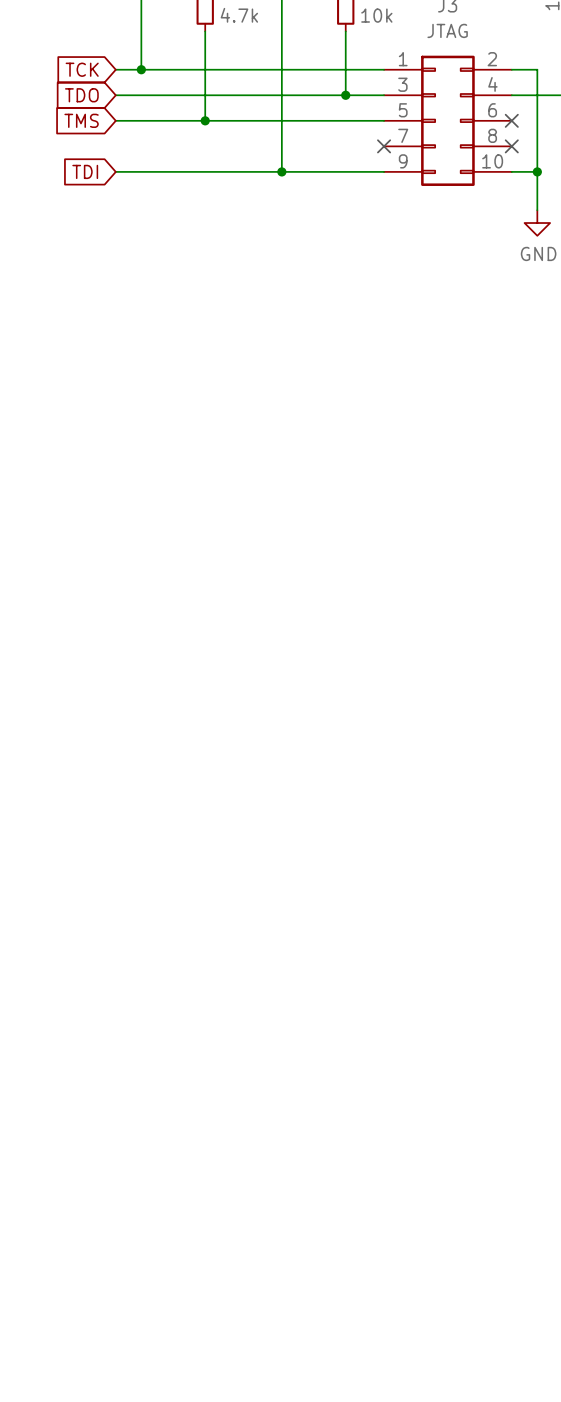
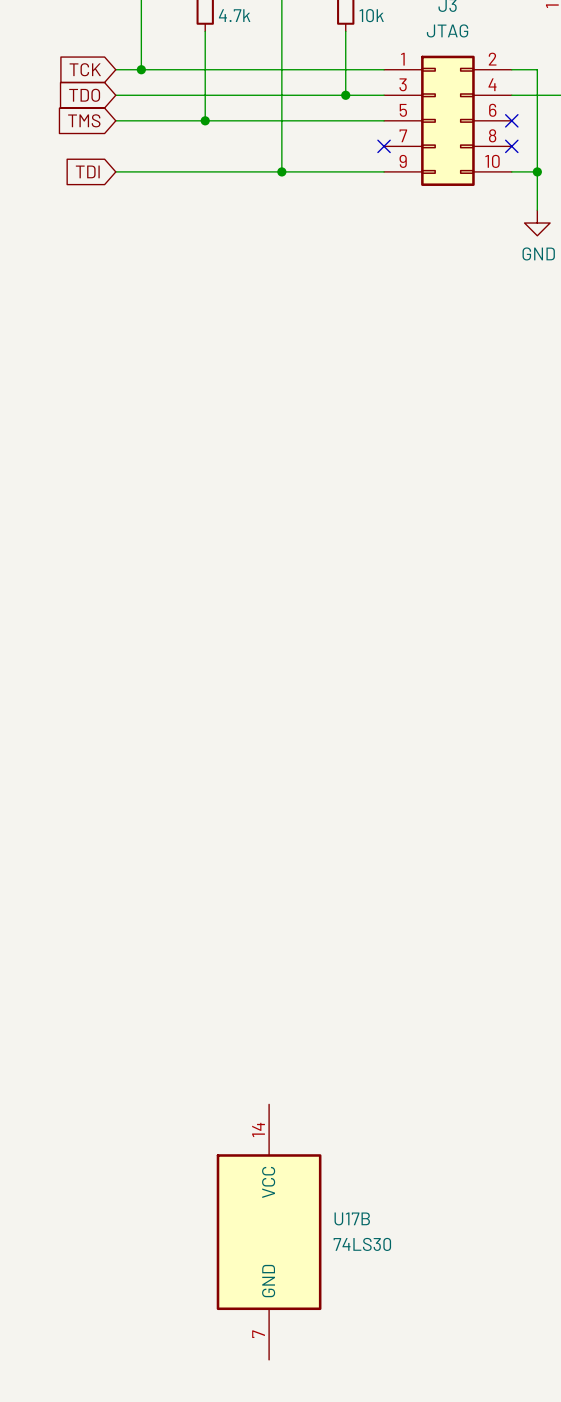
U17B: none -> 74LS30 (269, 1232)

